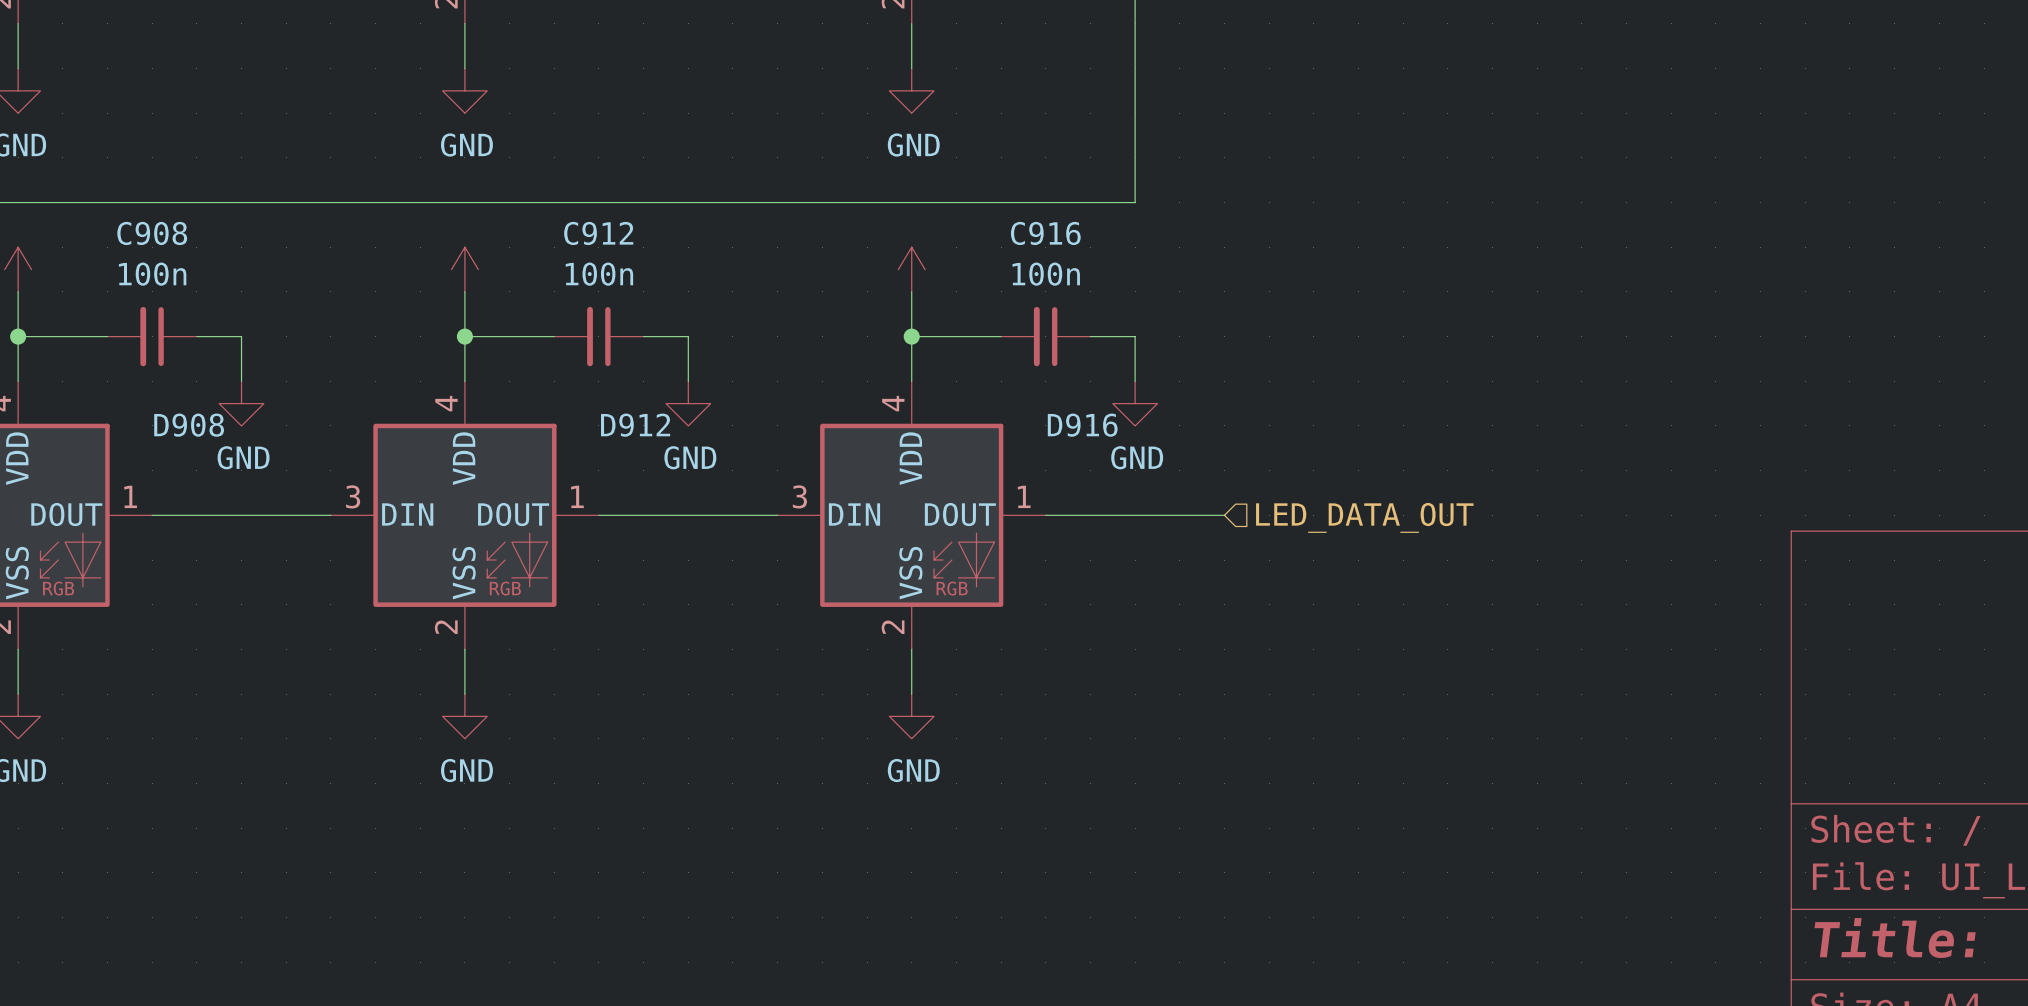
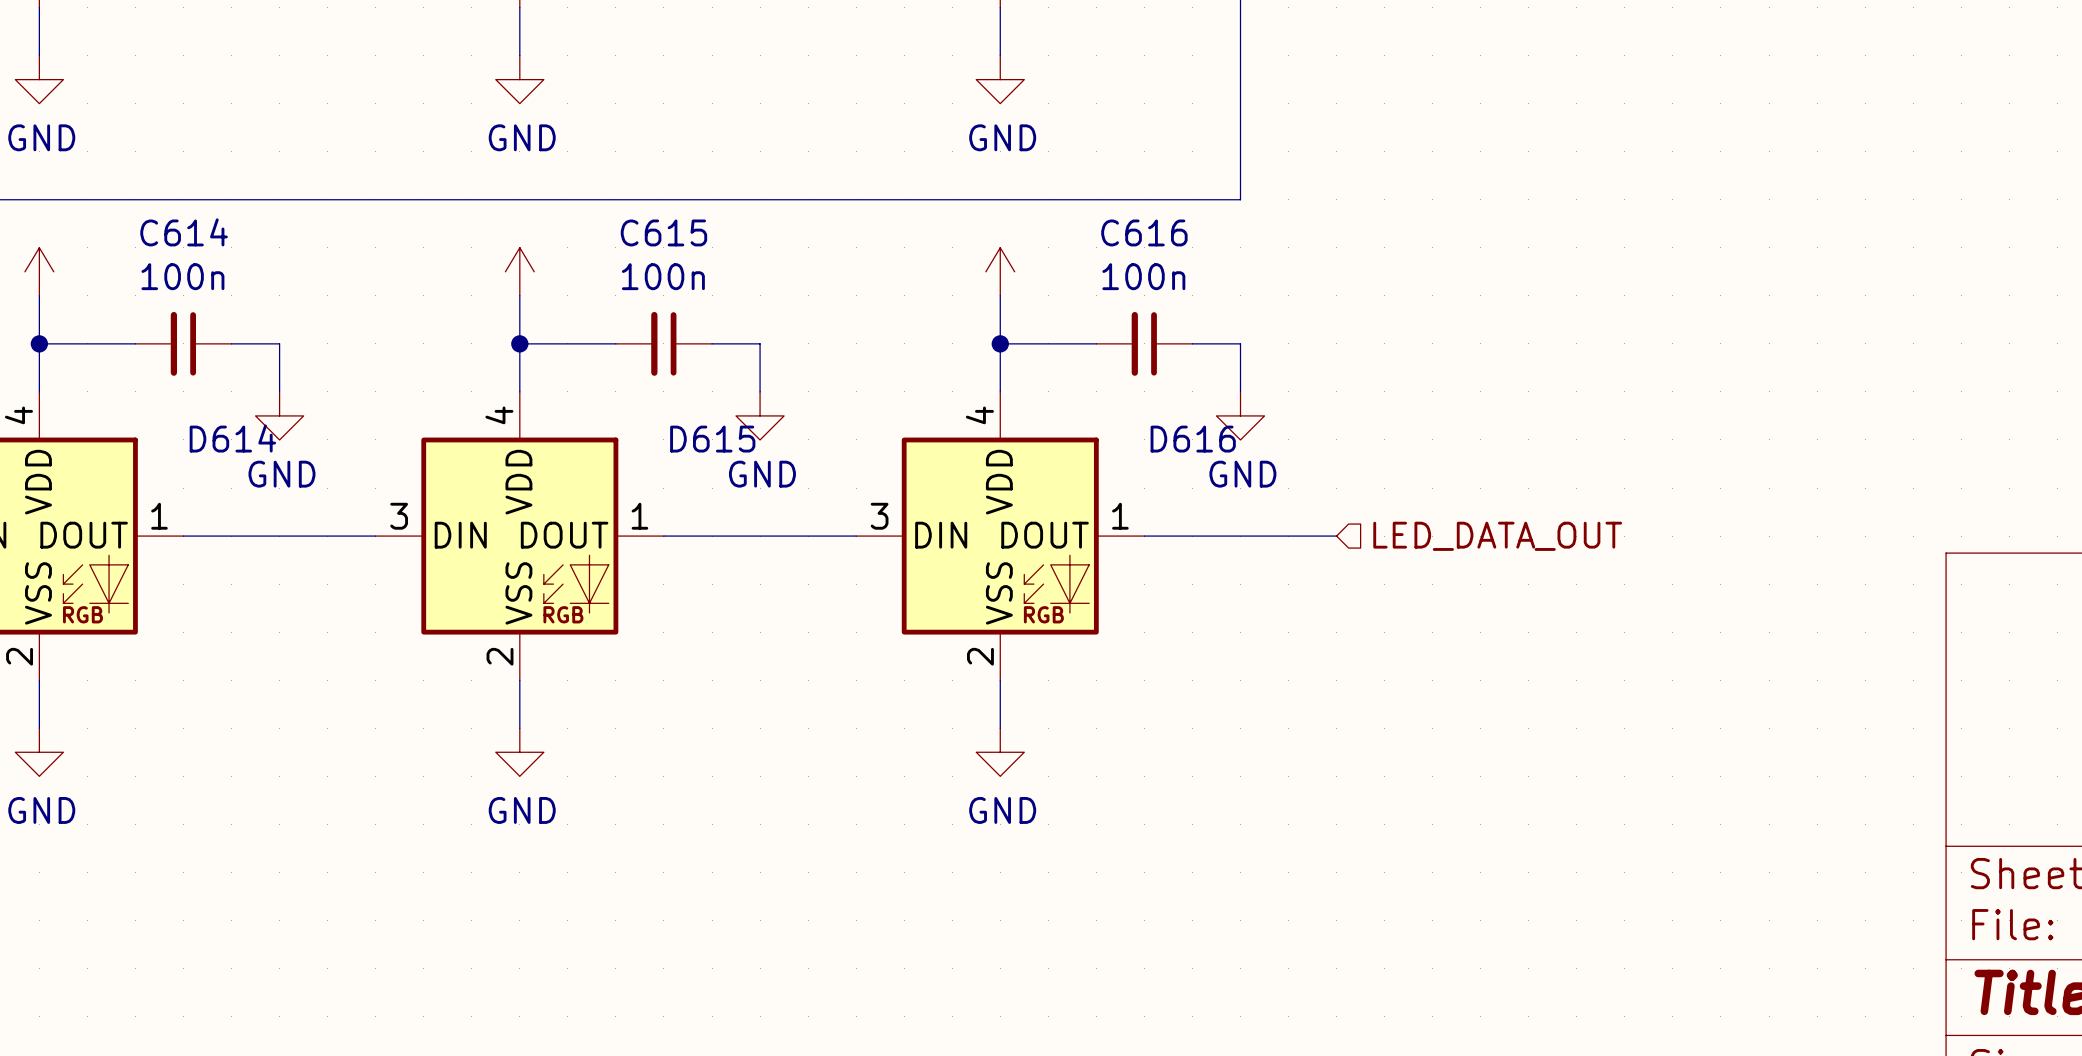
C908 name: C908 (152, 233) -> C614 (184, 232)
C912 name: C912 (598, 233) -> C615 (663, 232)
C916 name: C916 (1045, 233) -> C616 (1144, 232)
D908 name: D908 (189, 425) -> D614 (232, 438)
D912 name: D912 (635, 425) -> D615 (712, 439)
D916 name: D916 (1082, 425) -> D616 (1193, 439)

